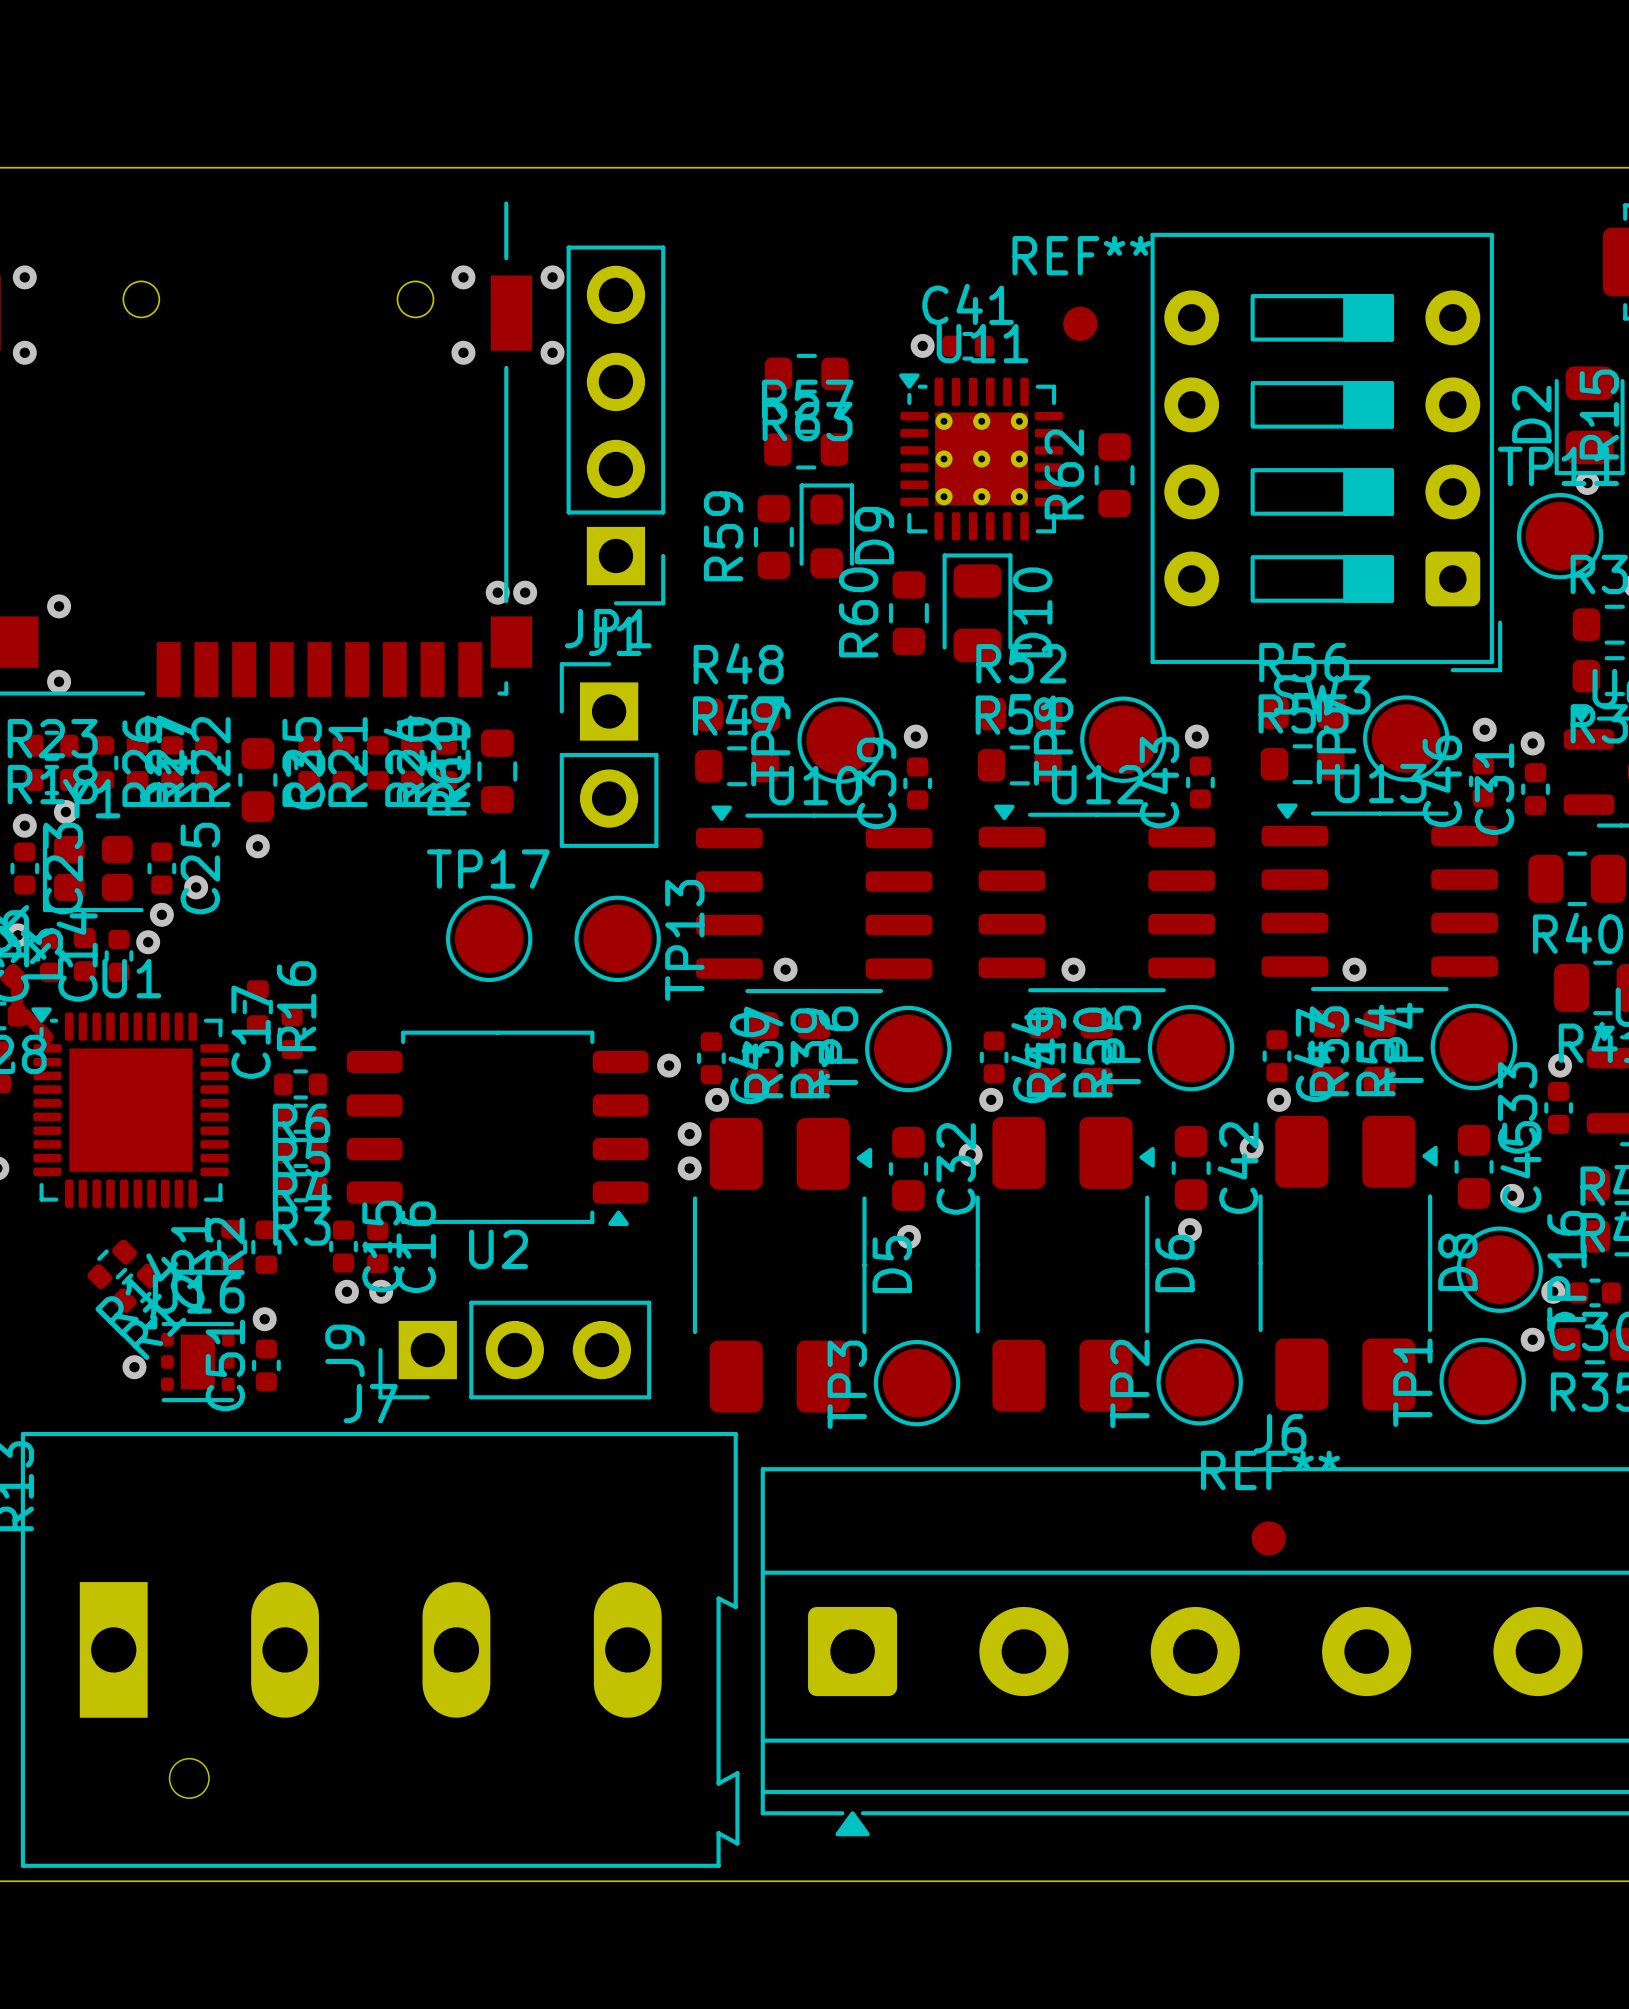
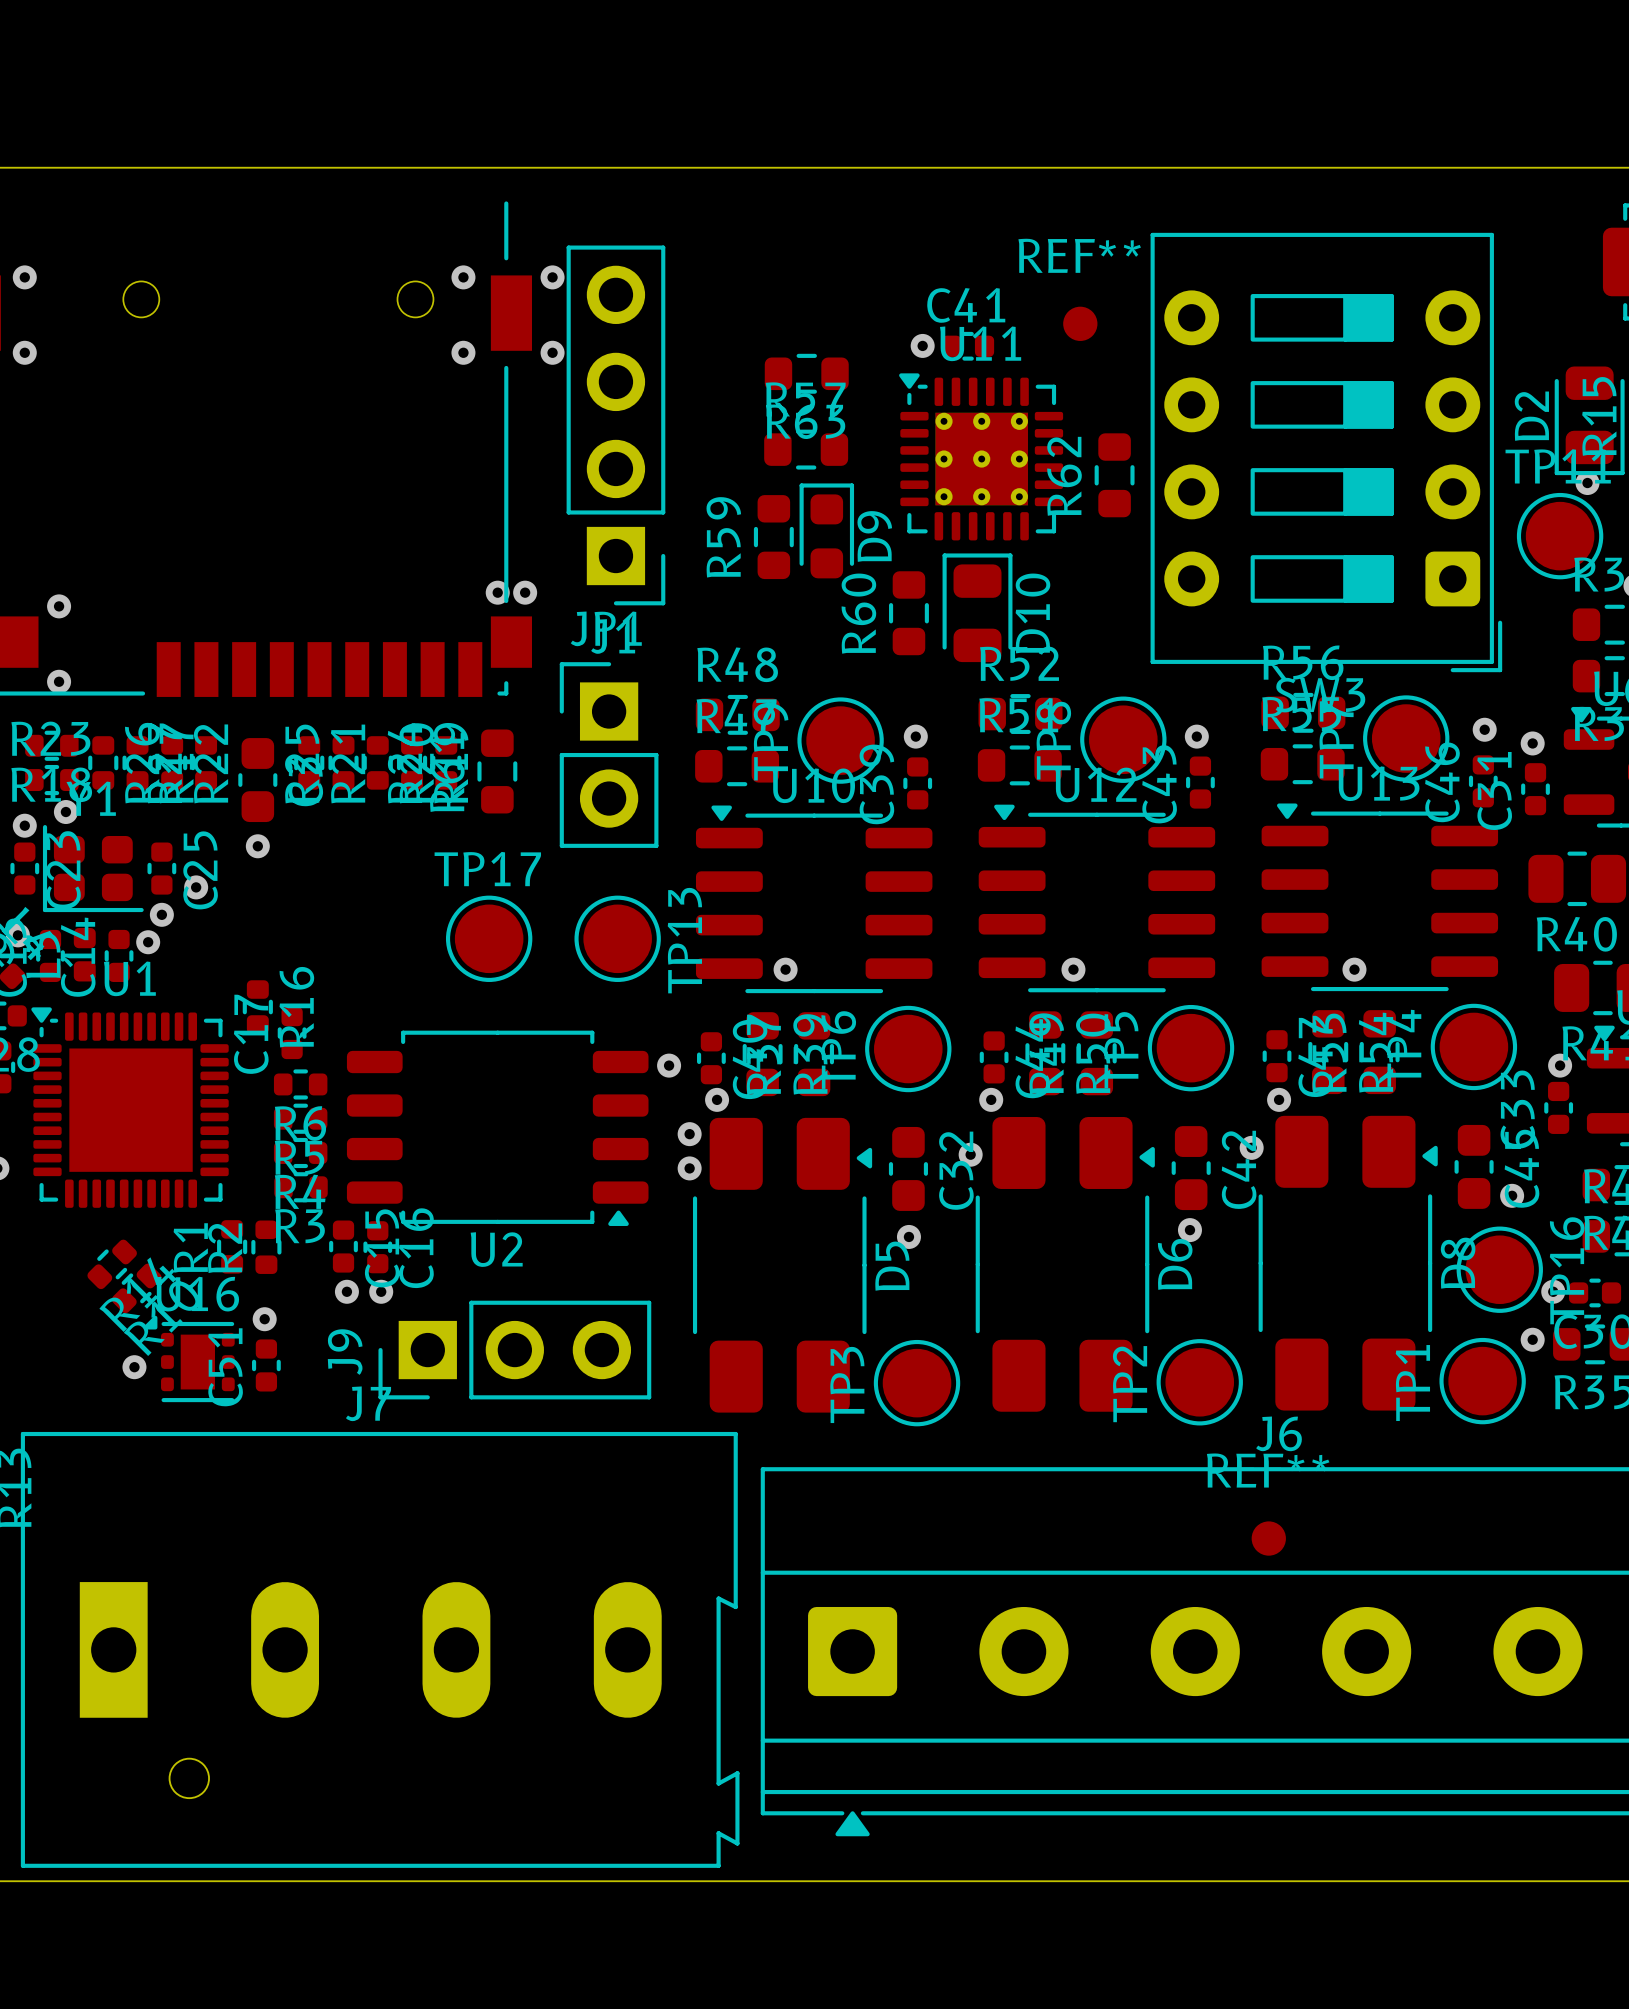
top track: (12, 976) (17, 980) (17, 1015) (26, 1015) (47, 1036) (47, 1048) -> none

